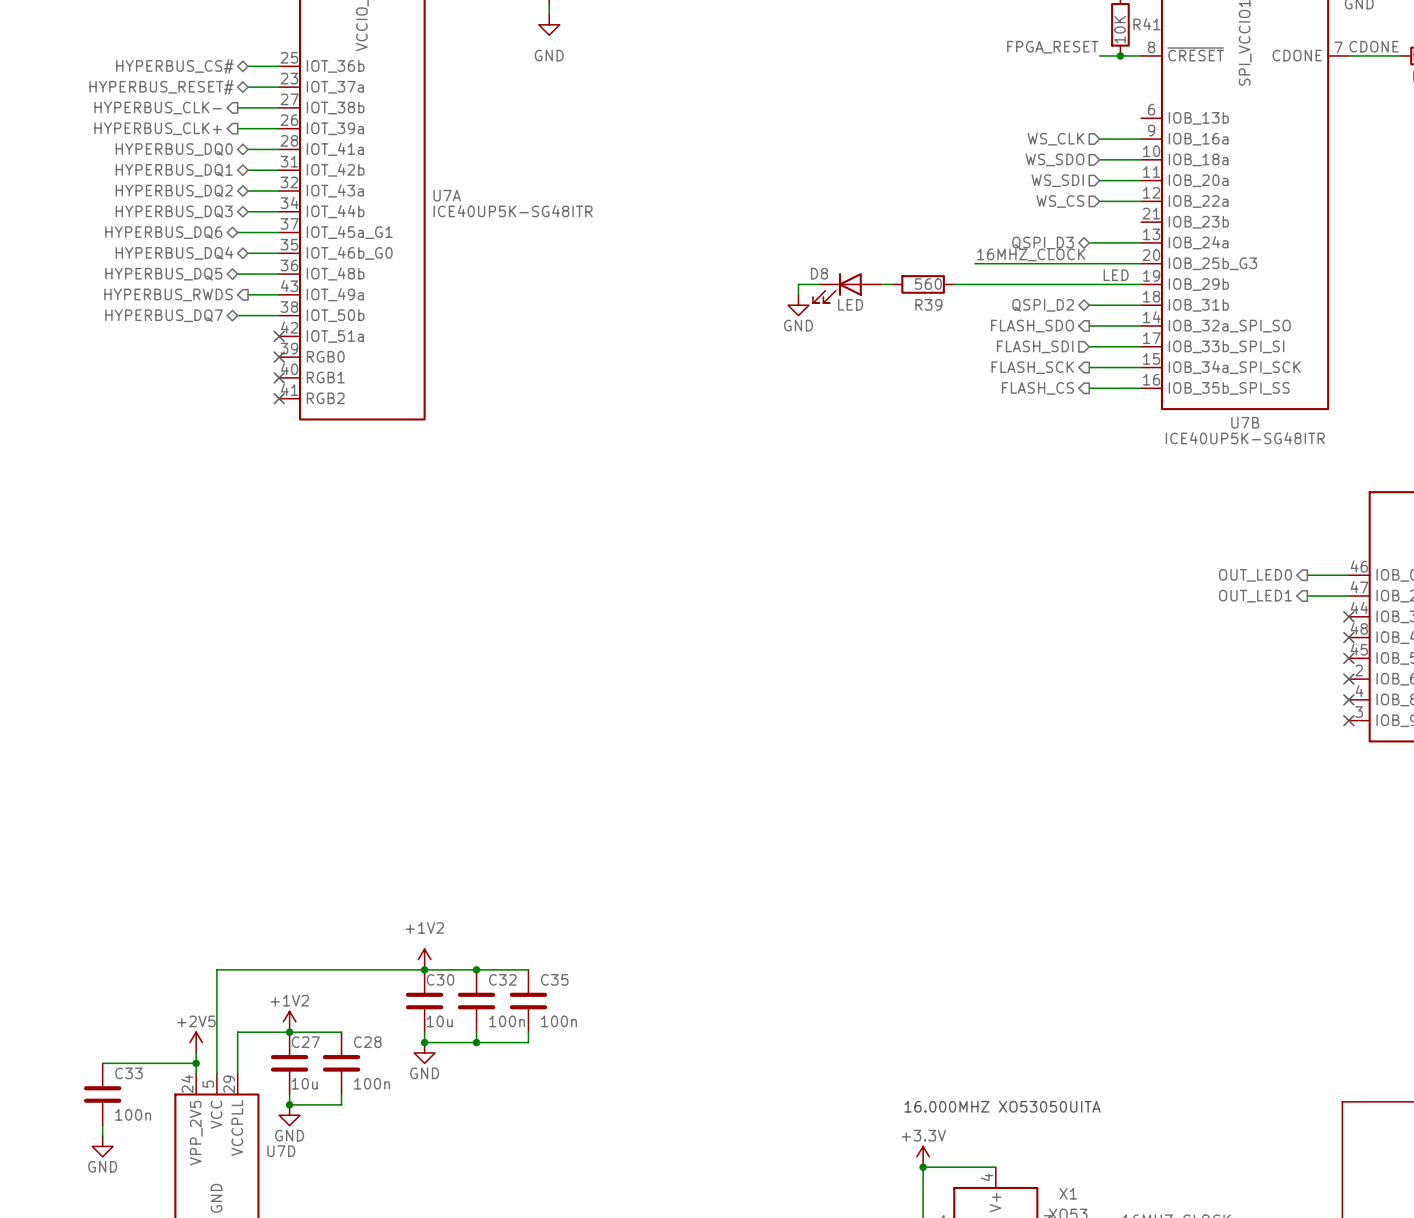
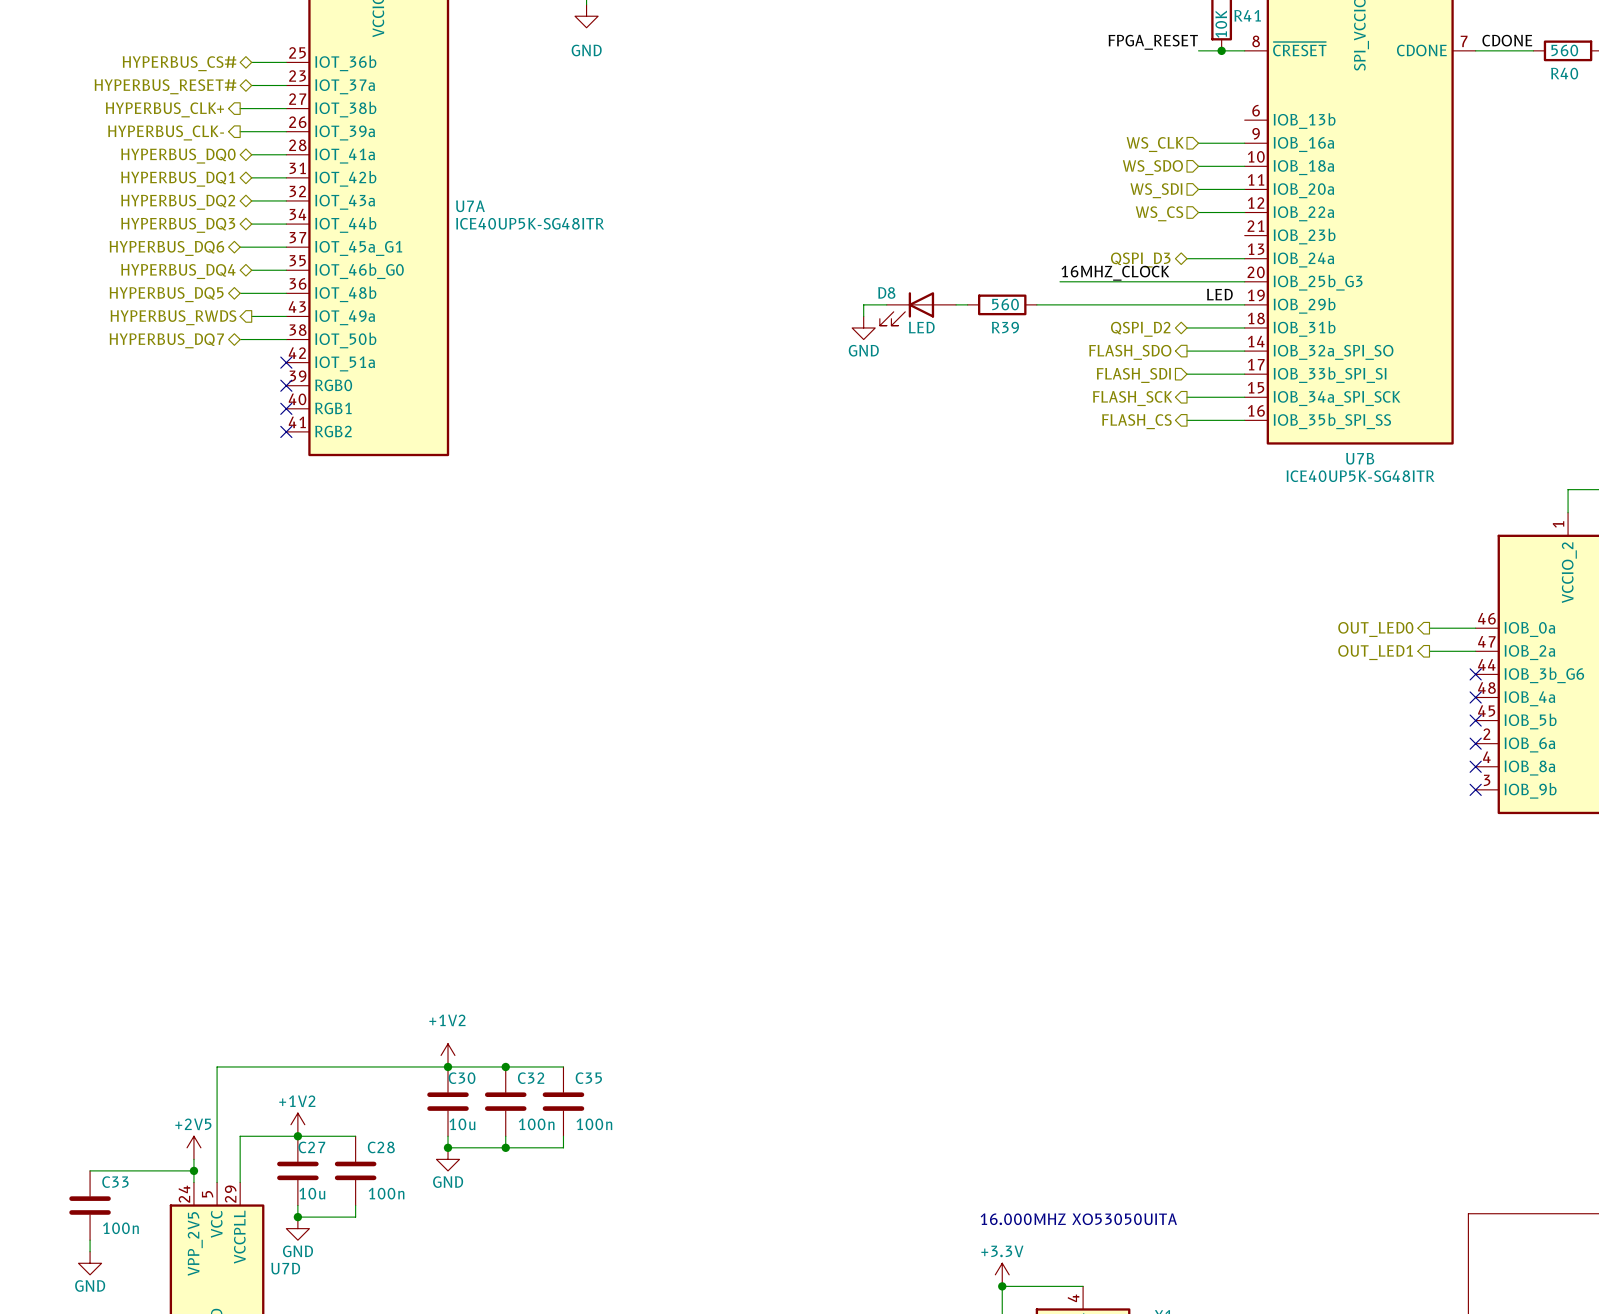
hierarchical label: HYPERBUS_CLK- (158, 108) -> HYPERBUS_CLK+ (164, 109)
hierarchical label: HYPERBUS_CLK+ (158, 128) -> HYPERBUS_CLK- (166, 132)

